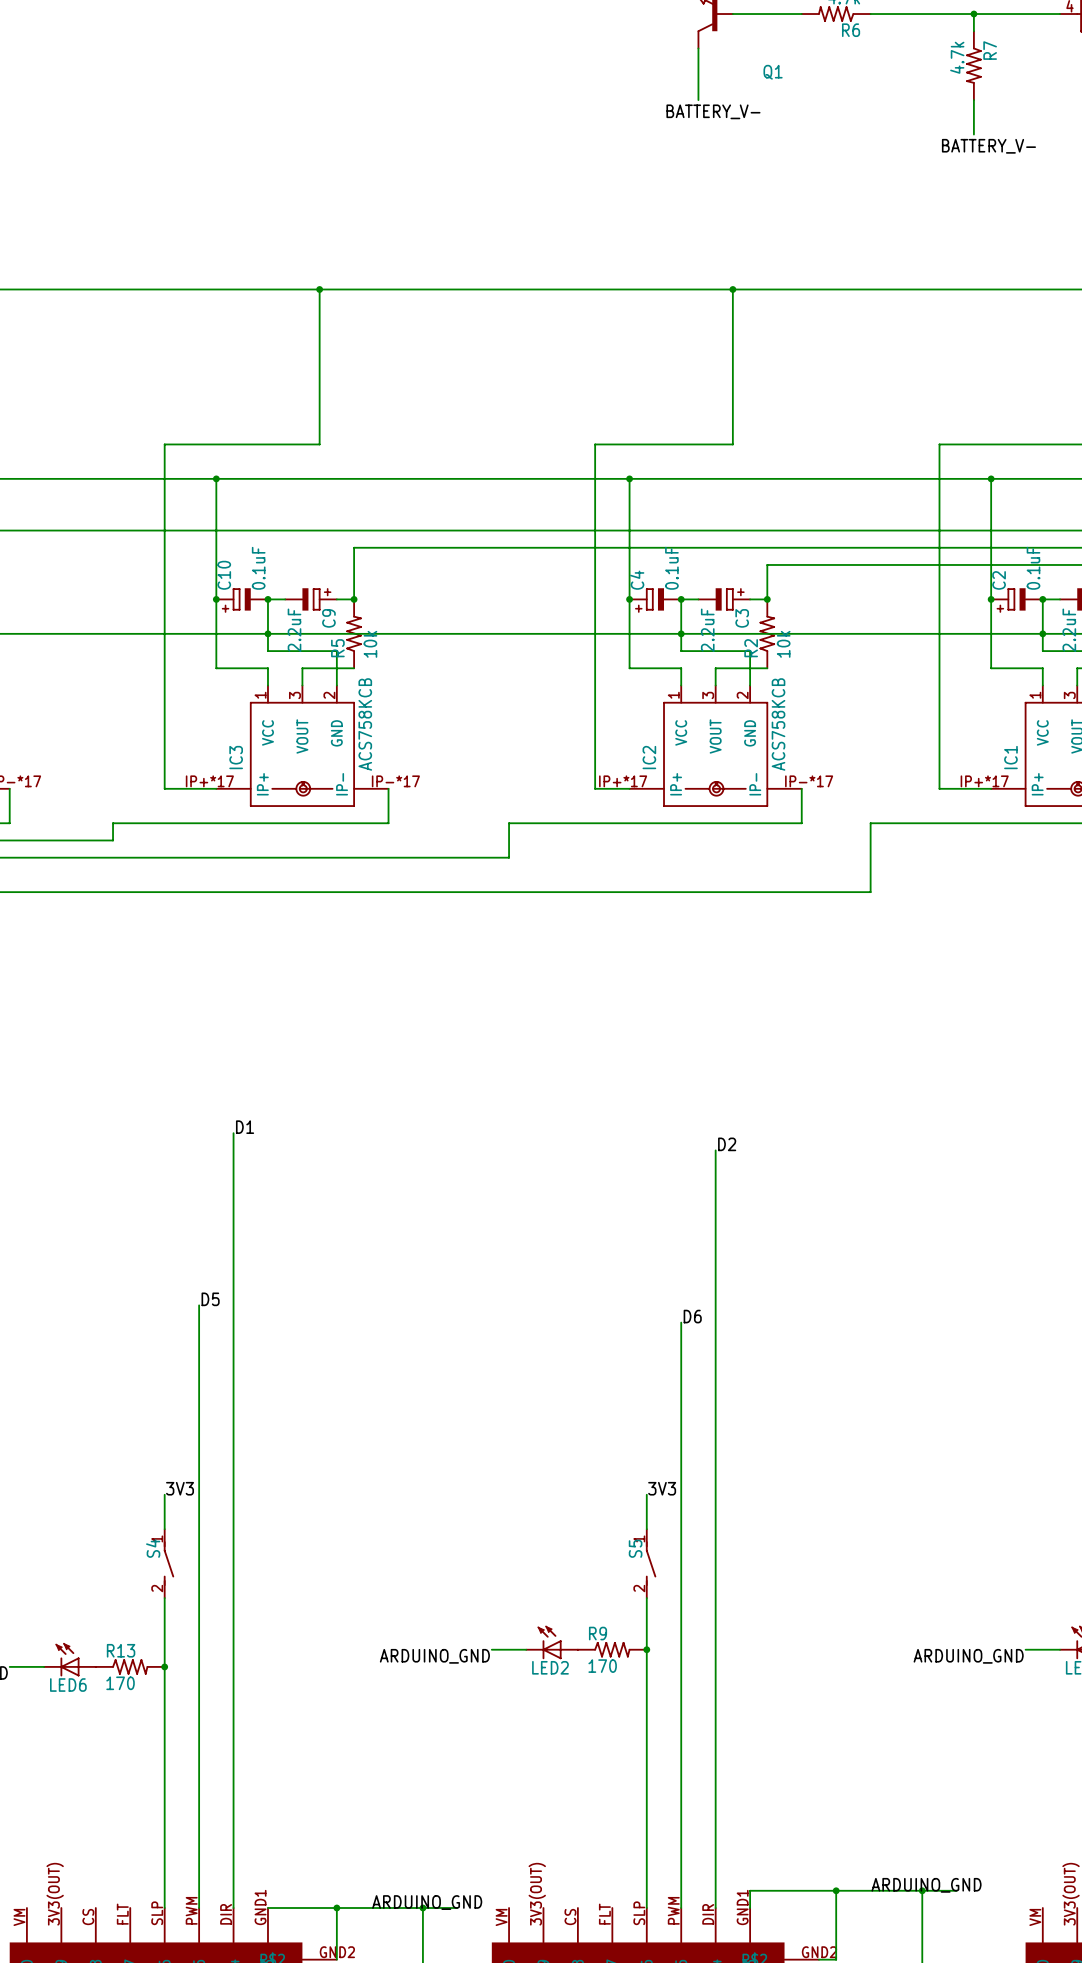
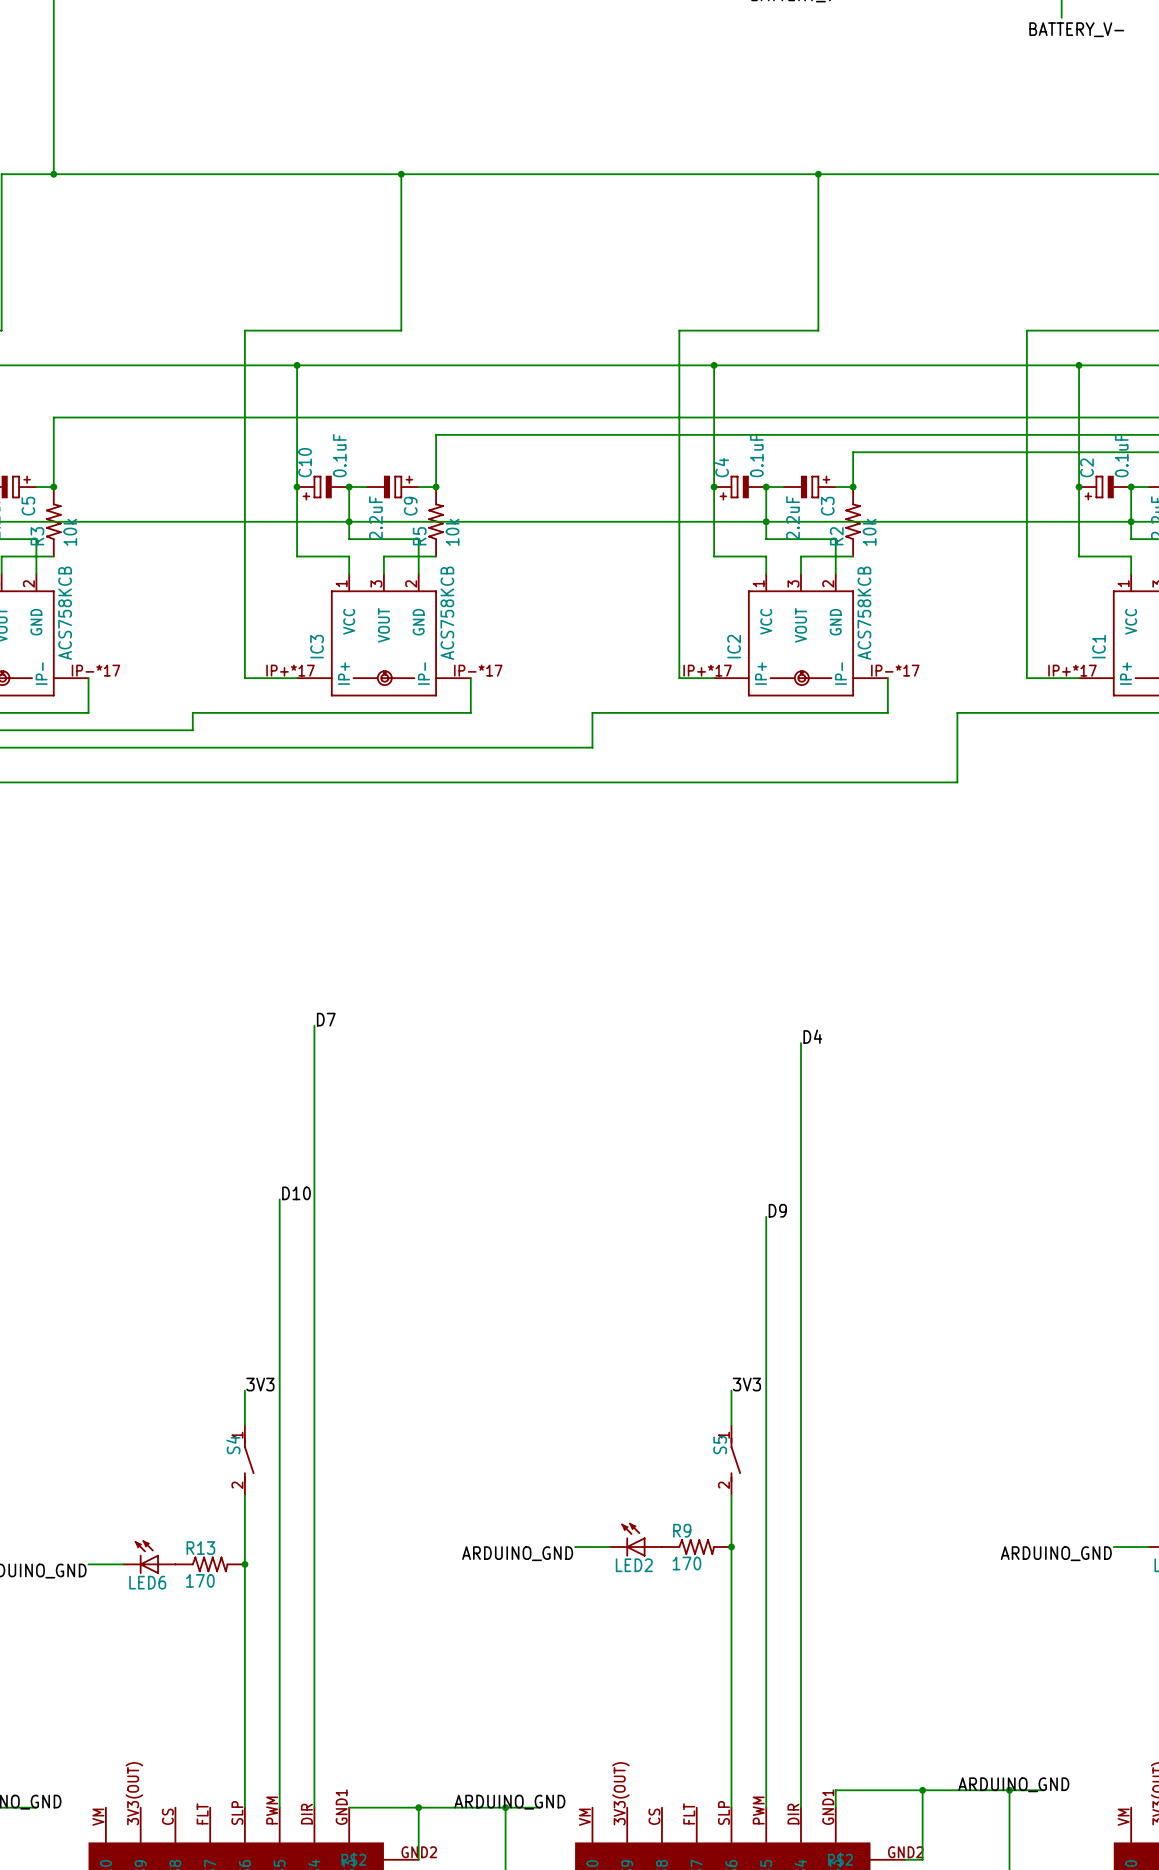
label: D1 (245, 1127) -> D7 (326, 1019)
label: D2 (727, 1144) -> D4 (812, 1036)
label: D5 (210, 1299) -> D10 (296, 1193)
label: D6 (692, 1316) -> D9 (777, 1210)

